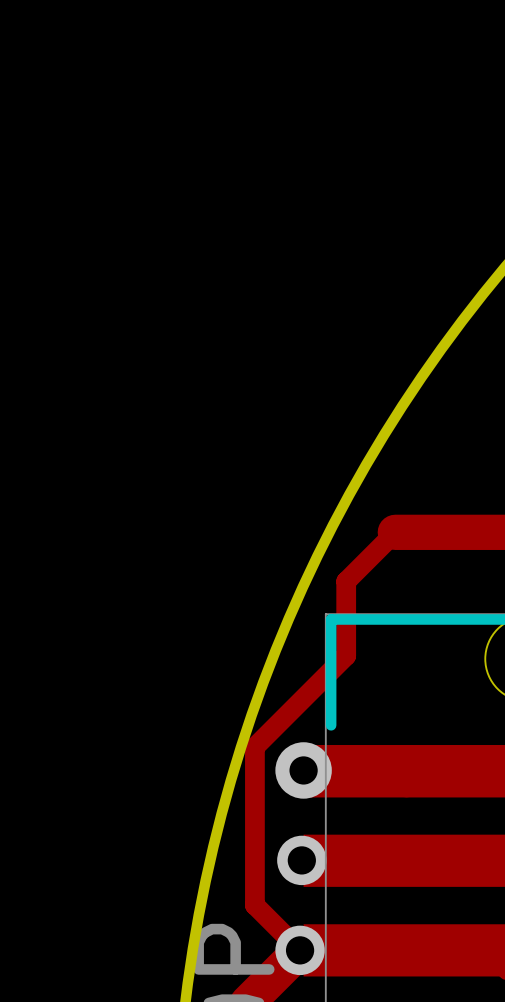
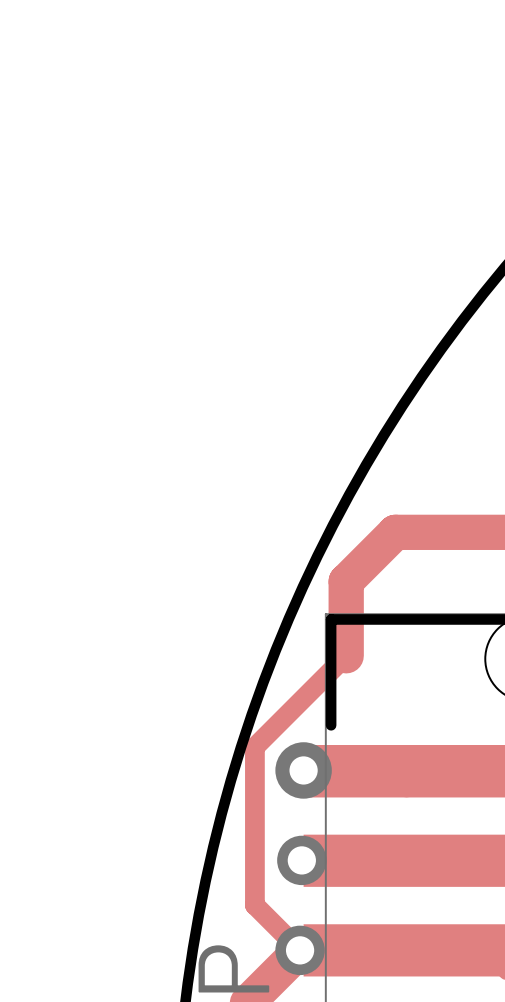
track width: thin (395, 532) (346, 581) (346, 655) -> thick (395, 532) (346, 581) (346, 655)

